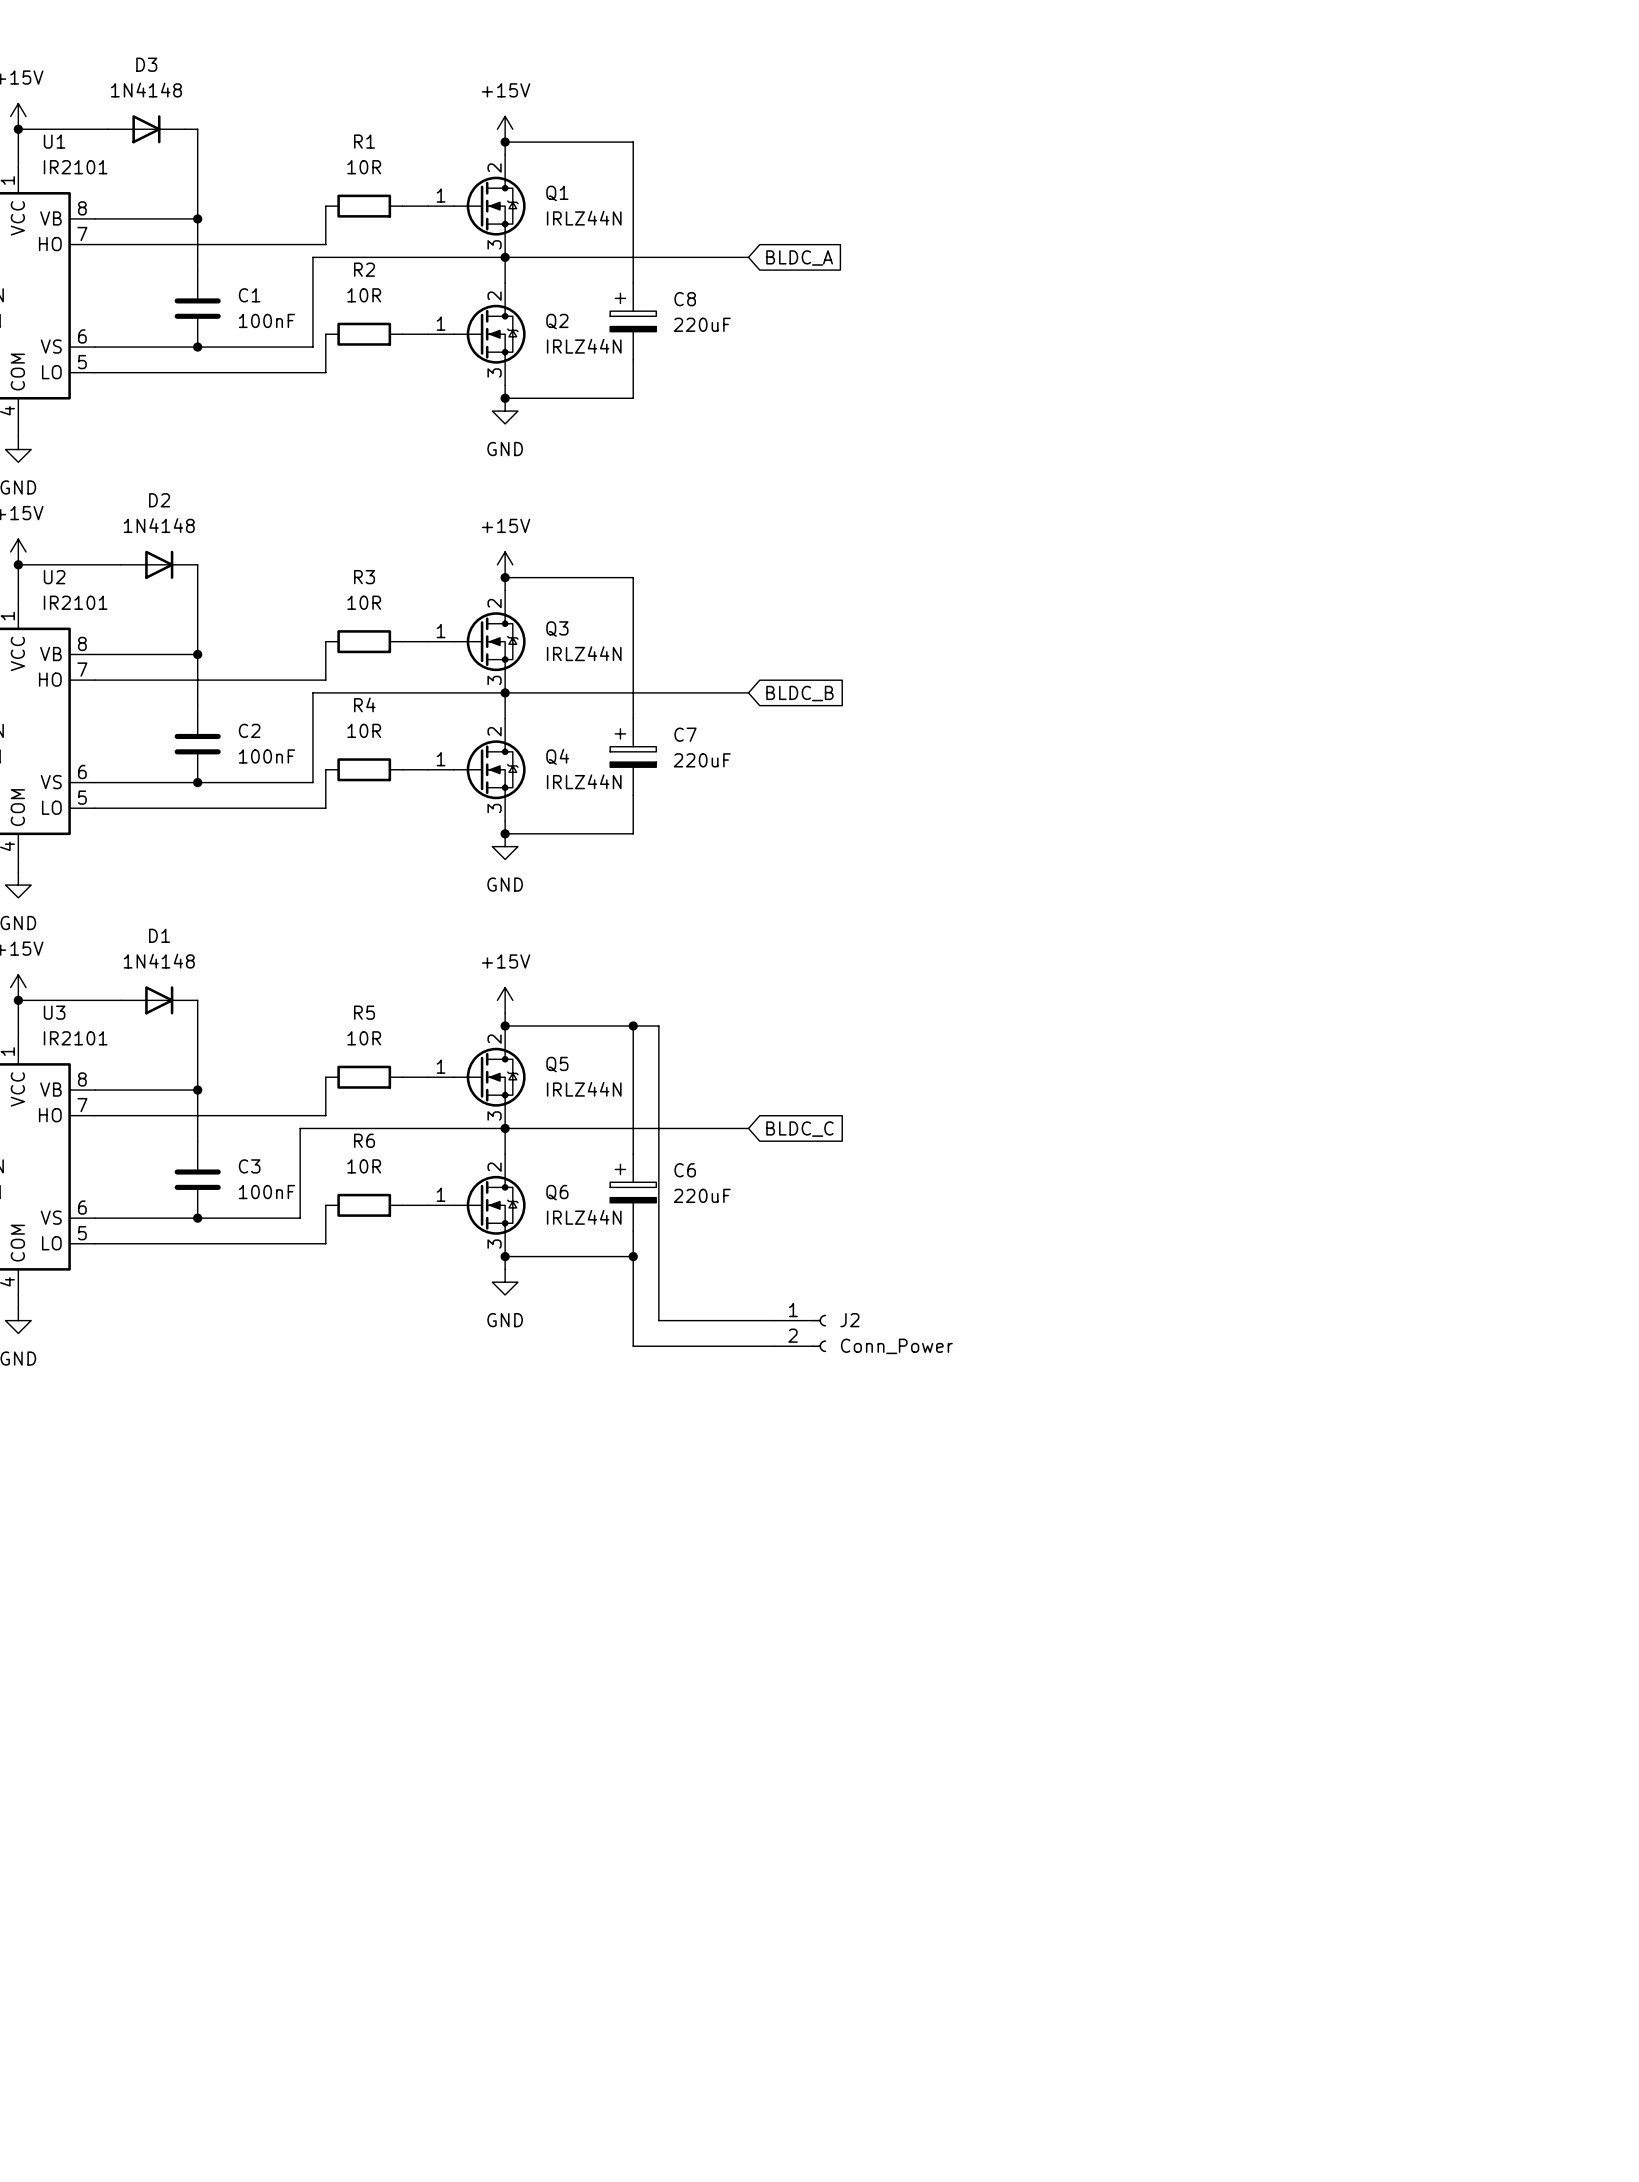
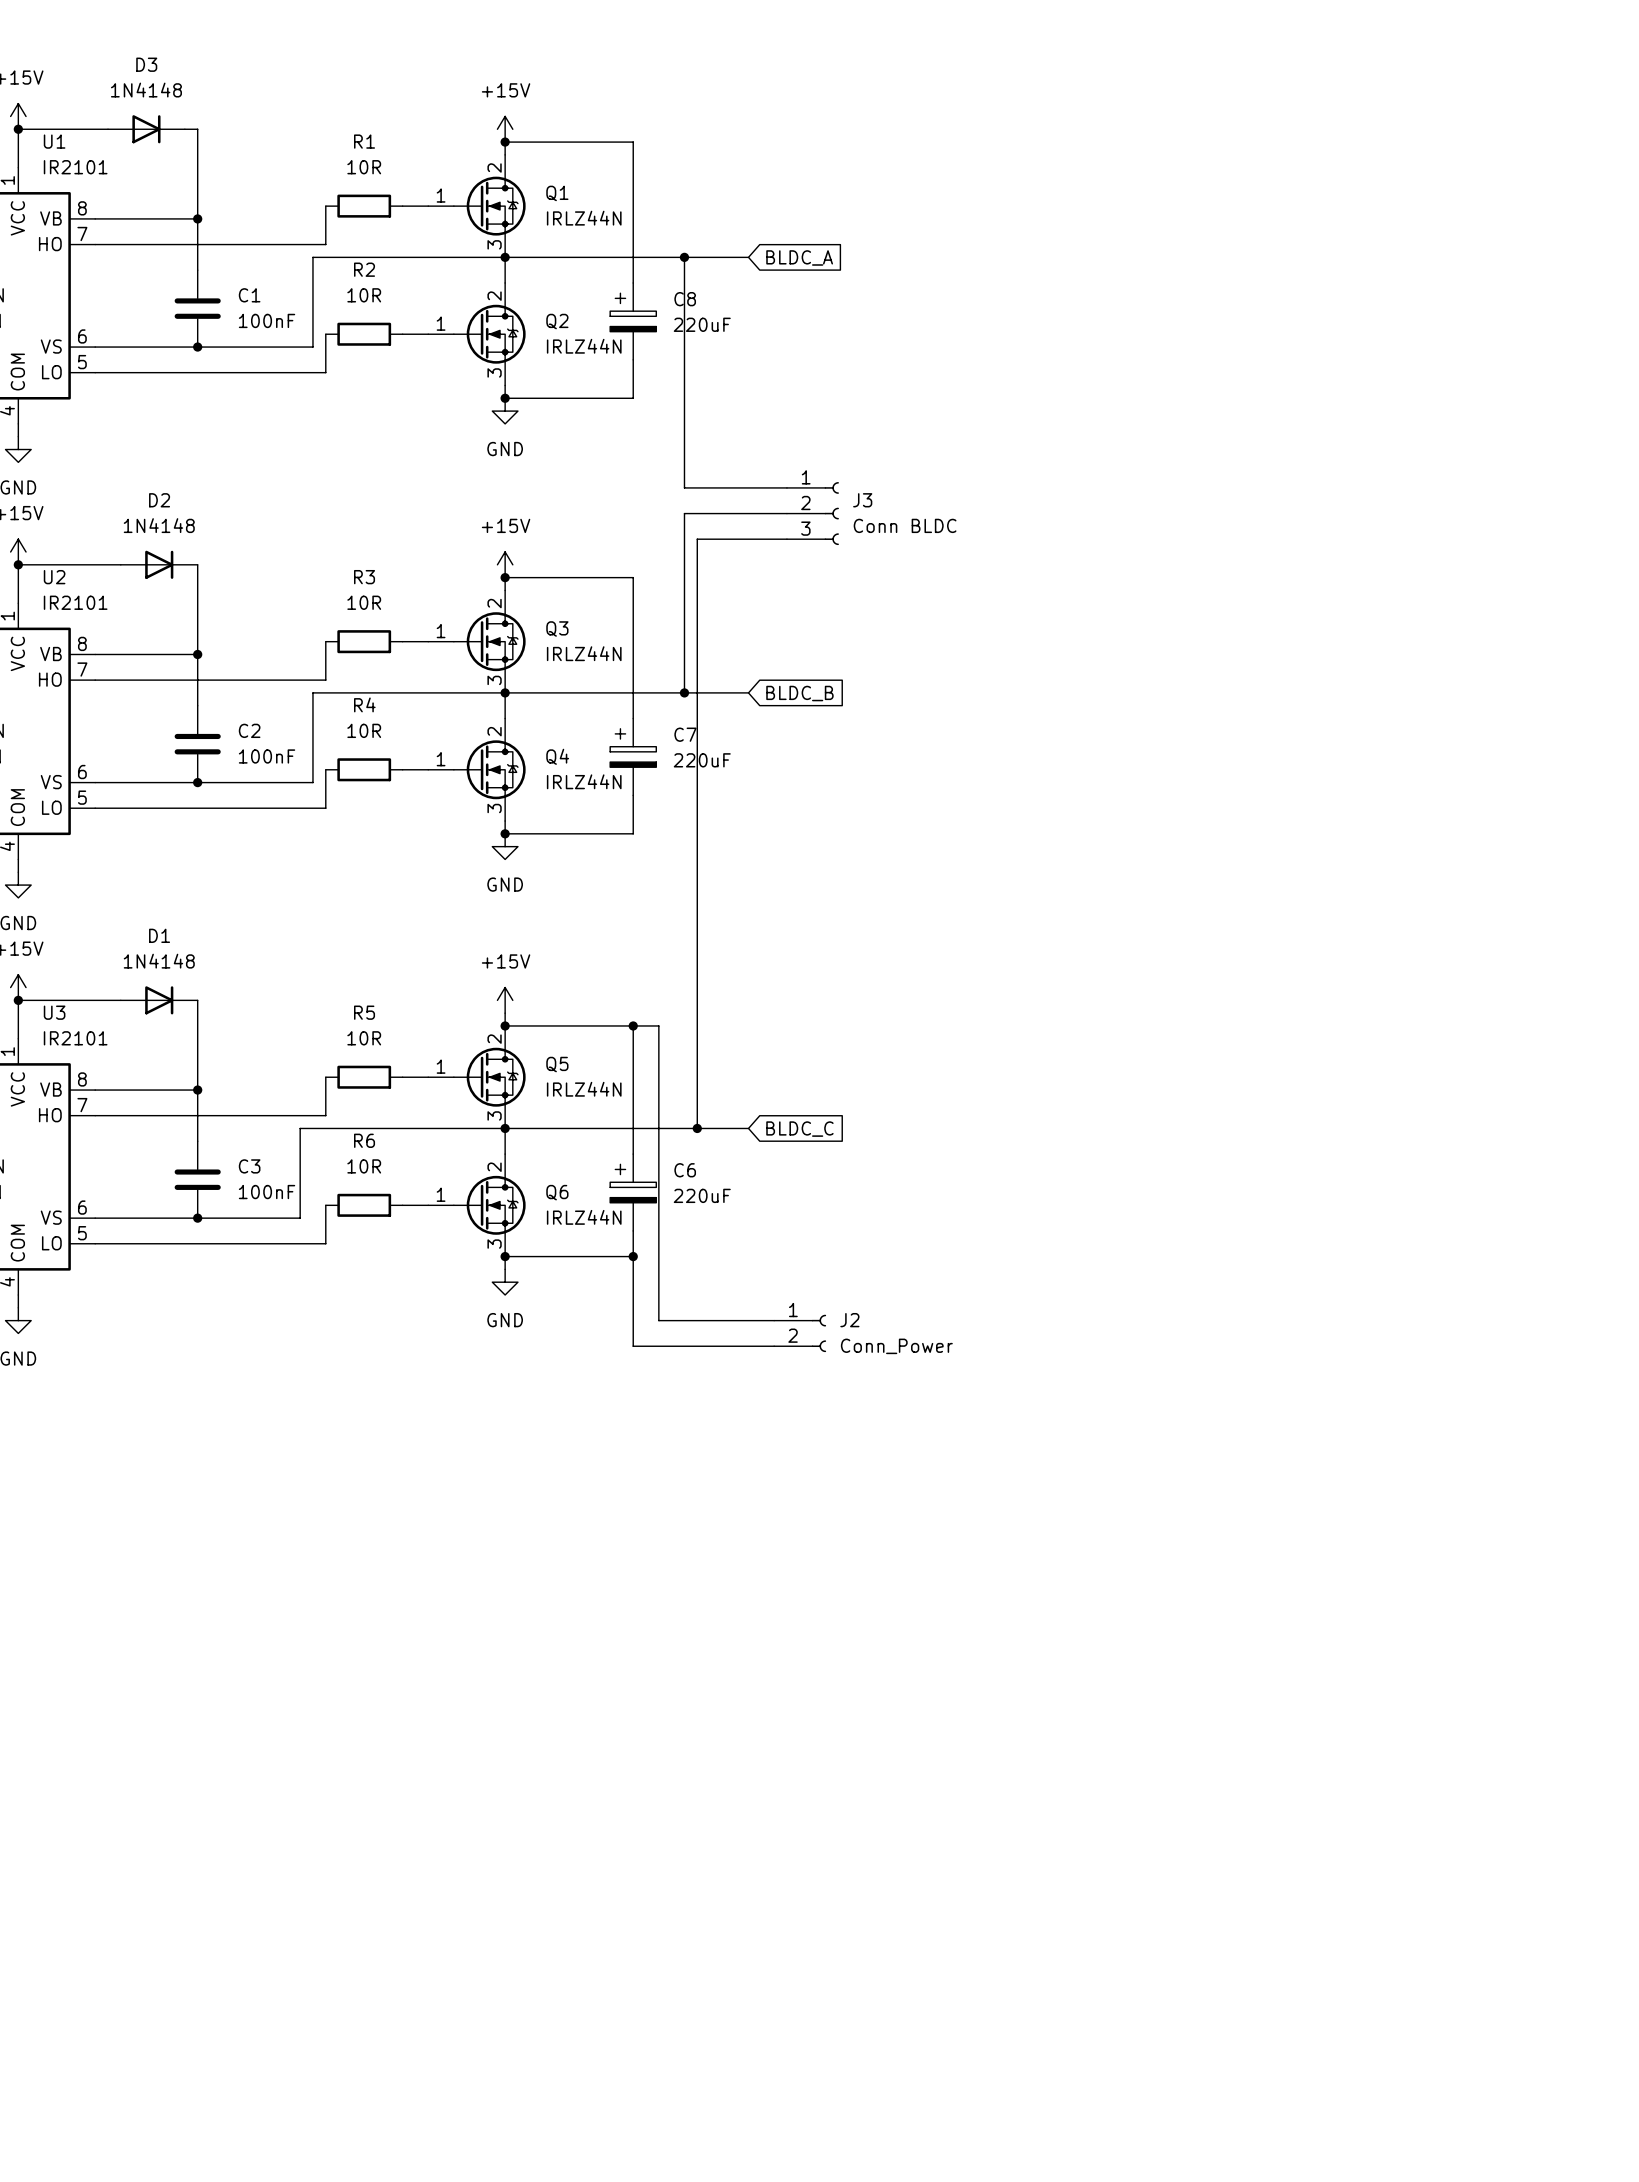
wire: none -> (684, 257) (684, 487) (786, 487)
junction: none -> (684, 257)
wire: none -> (786, 513) (684, 513) (684, 692)
J3: none -> Conn BLDC (812, 513)
wire: none -> (786, 539) (697, 539) (697, 1128)
junction: none -> (684, 692)
junction: none -> (697, 1128)

